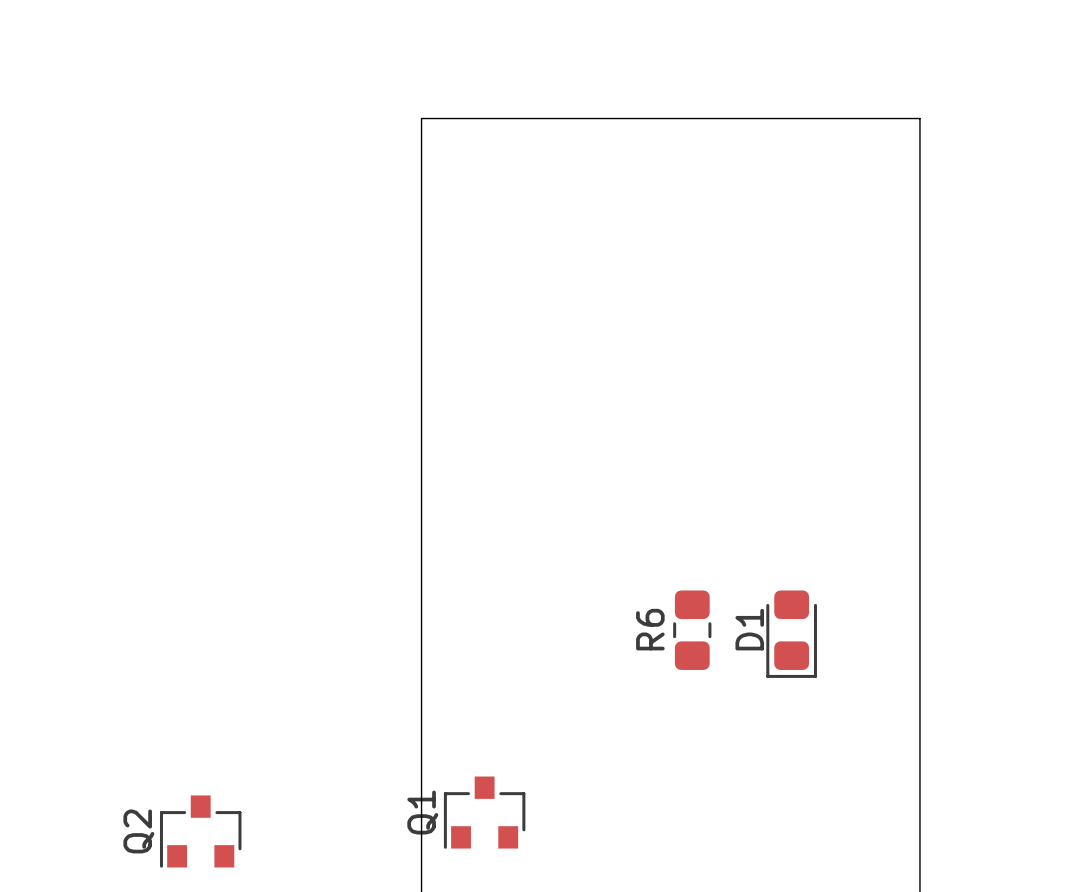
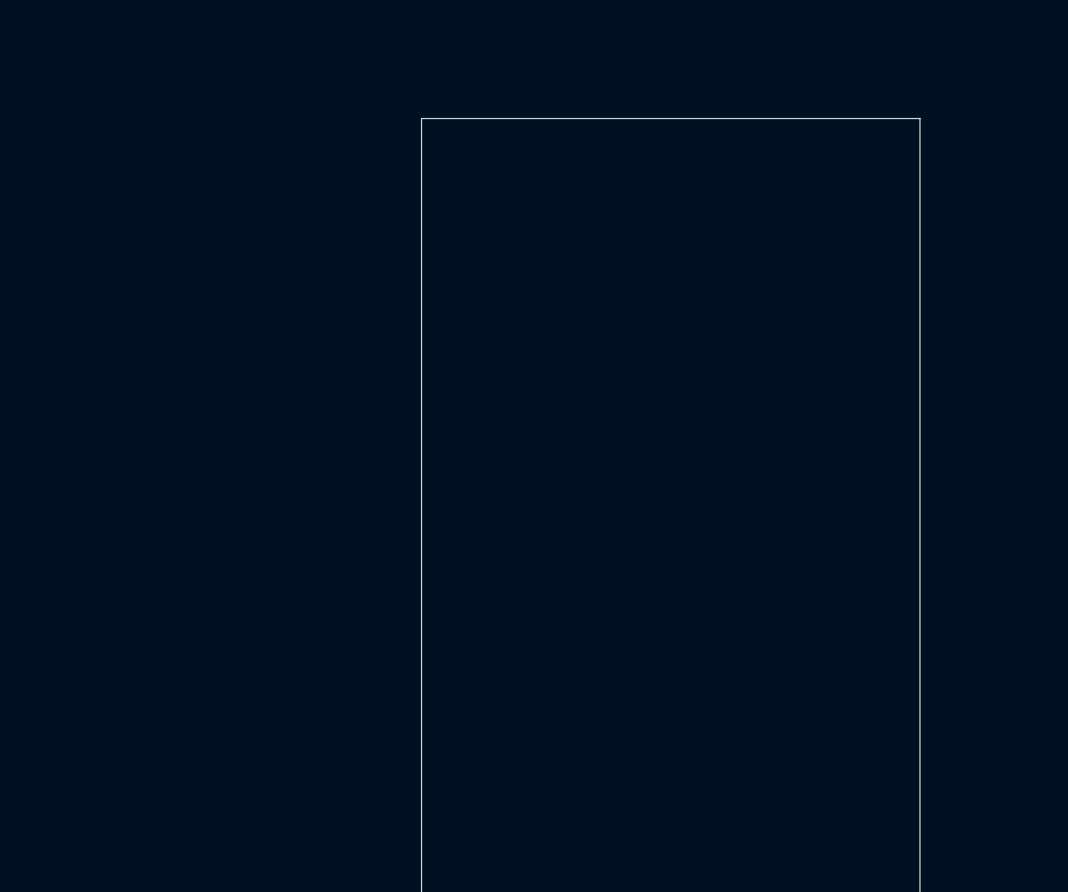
R6: (692, 630) -> none
D1: (791, 634) -> none
Q1: (484, 812) -> none
Q2: (200, 831) -> none

